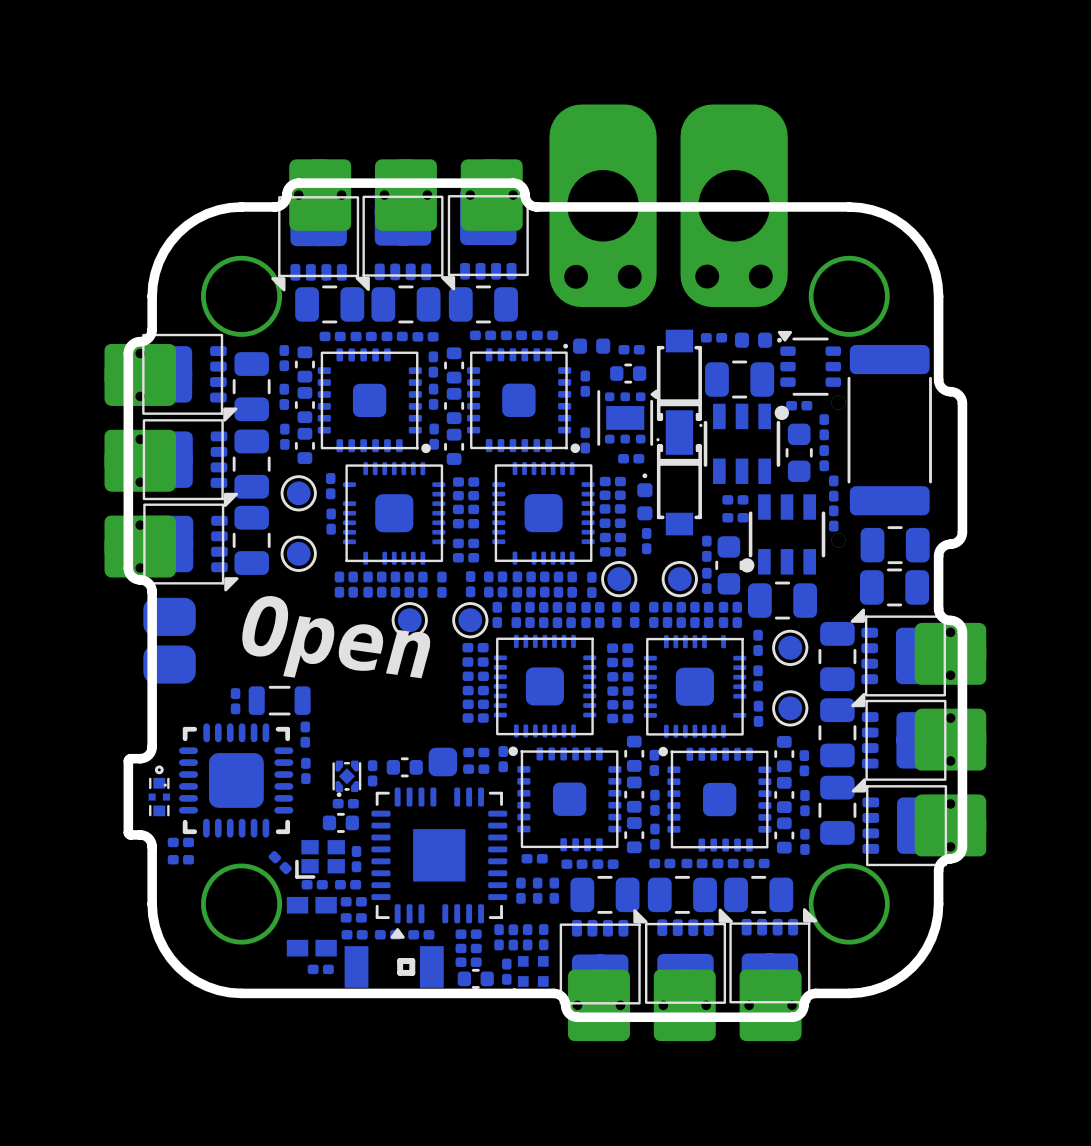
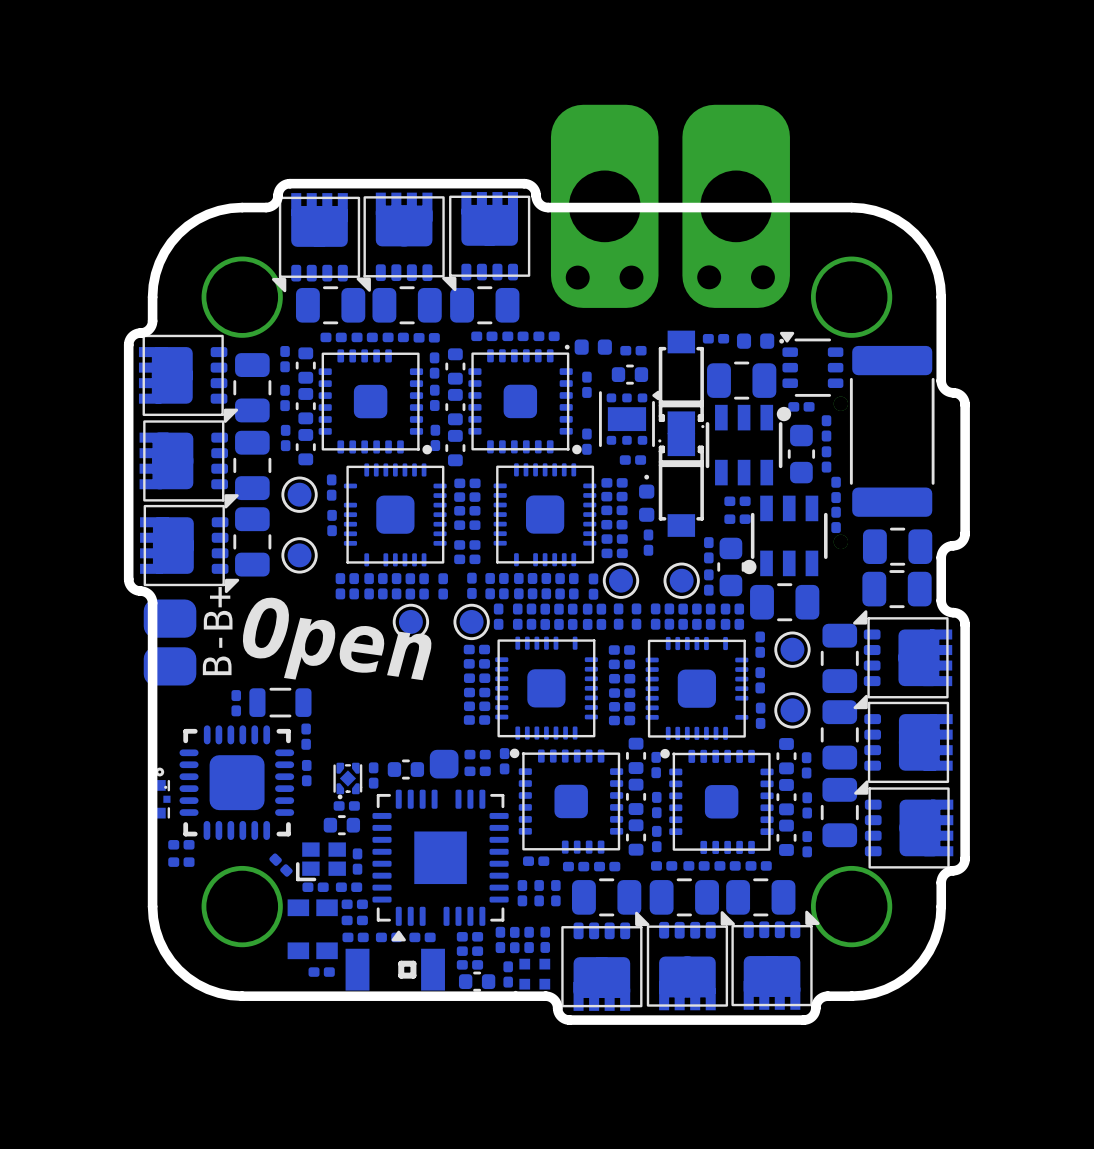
part footprint: [104, 104, 987, 1042] -> [123, 104, 970, 1025]
text: none -> B+ (218, 608)
part footprint: [493, 634, 597, 738] -> [495, 636, 598, 740]
text: none -> B- (217, 656)

